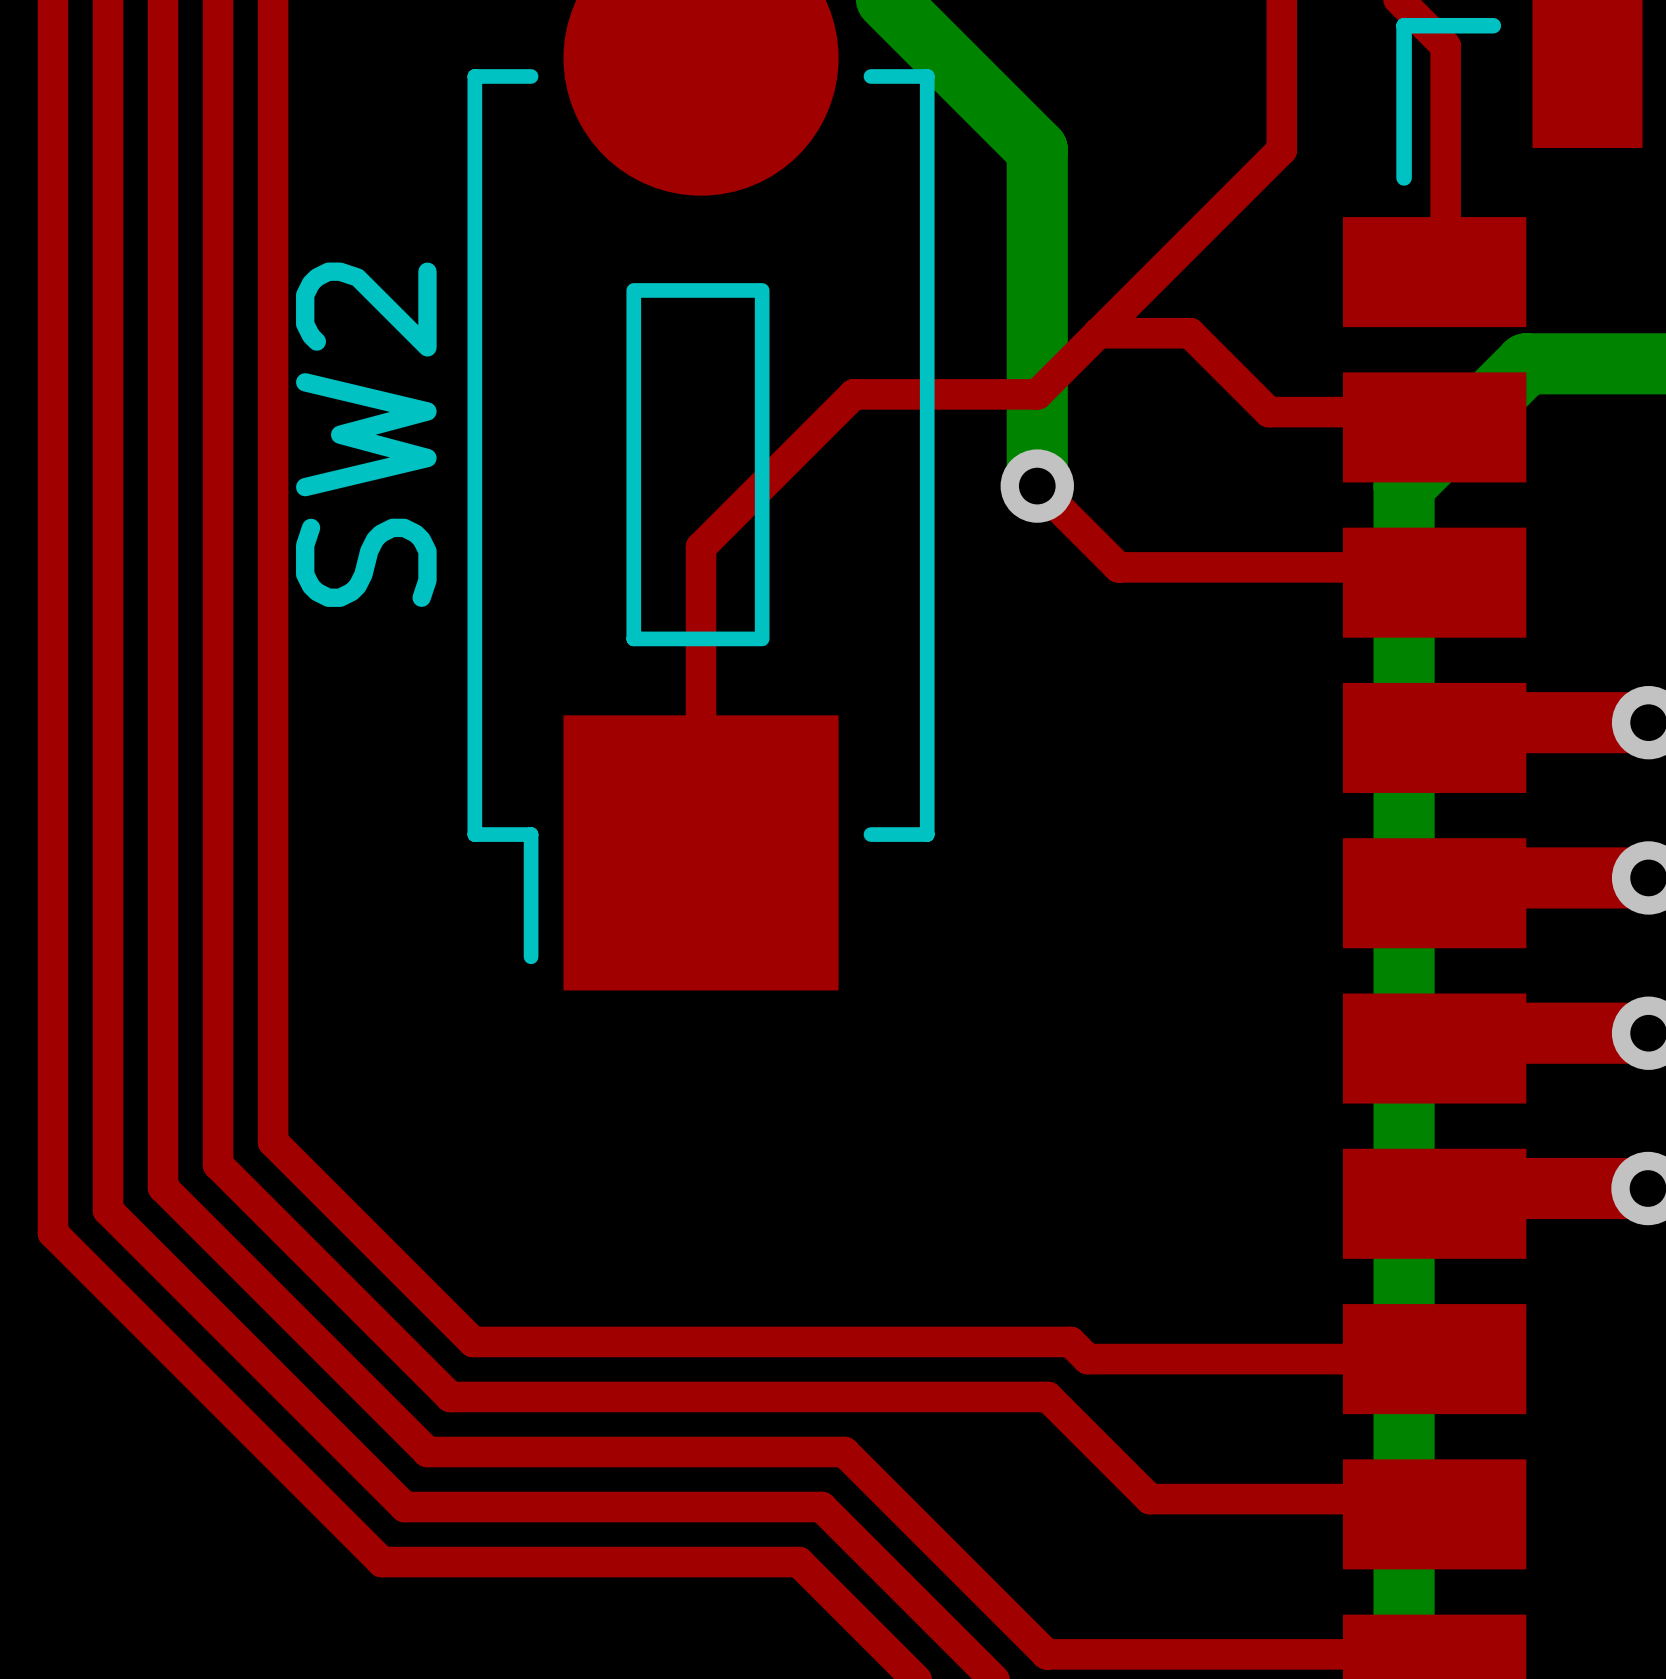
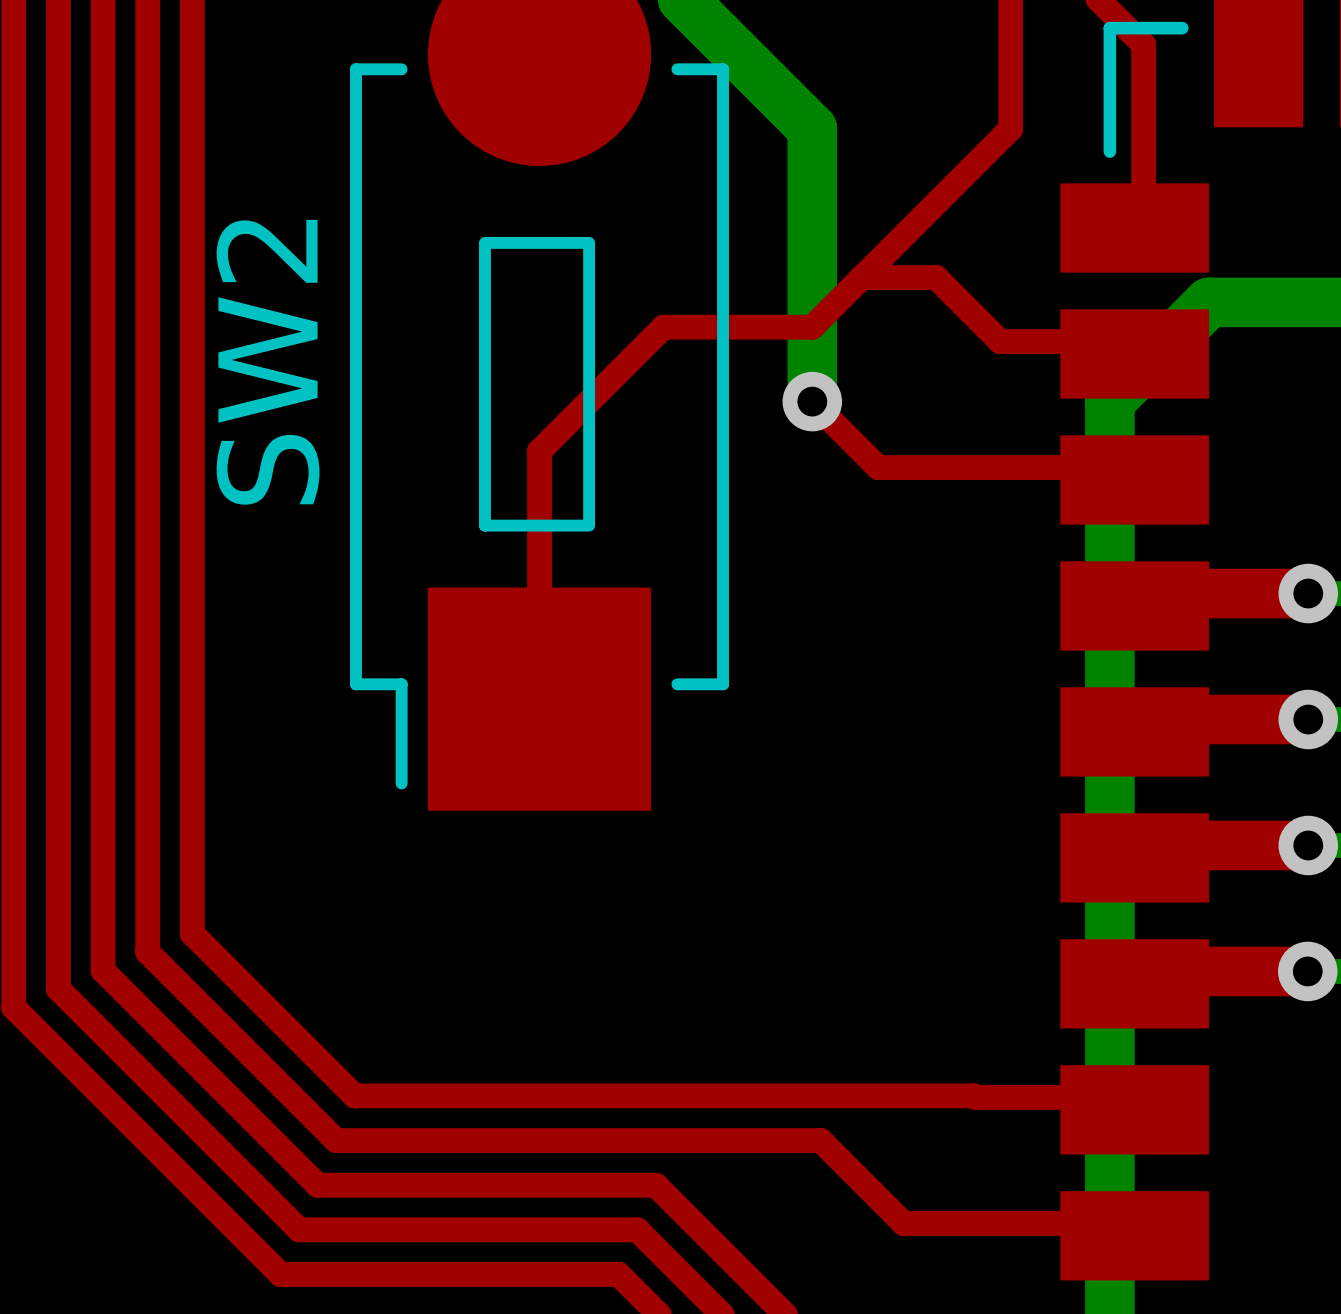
top track: (1070, 1341) (1087, 1359) (1434, 1359) -> (839, 1095) (1143, 1097)

